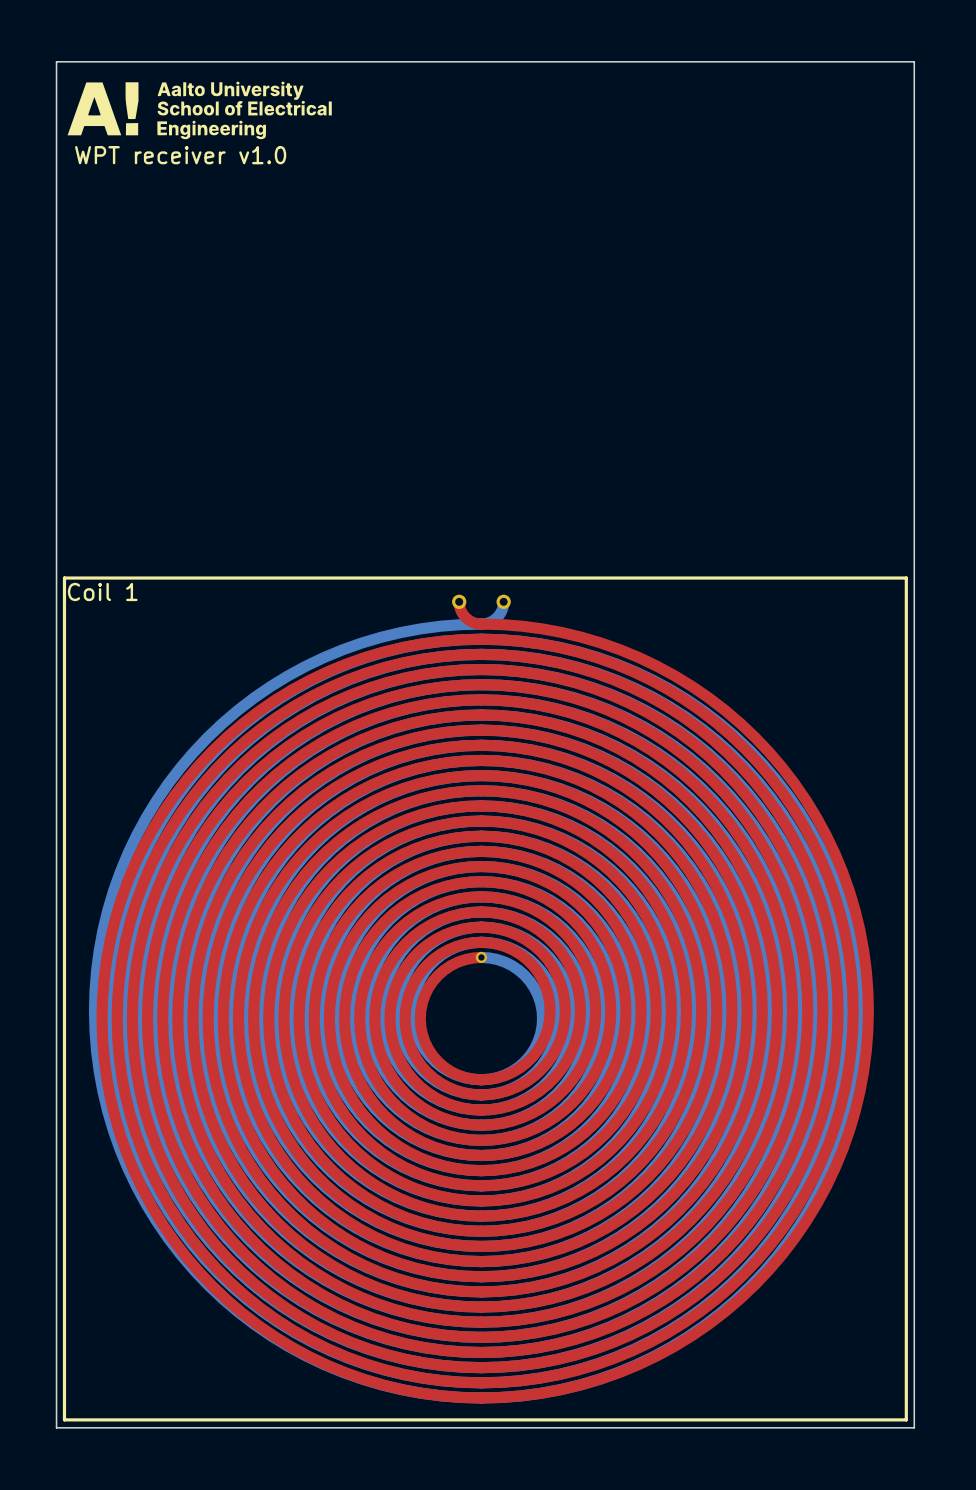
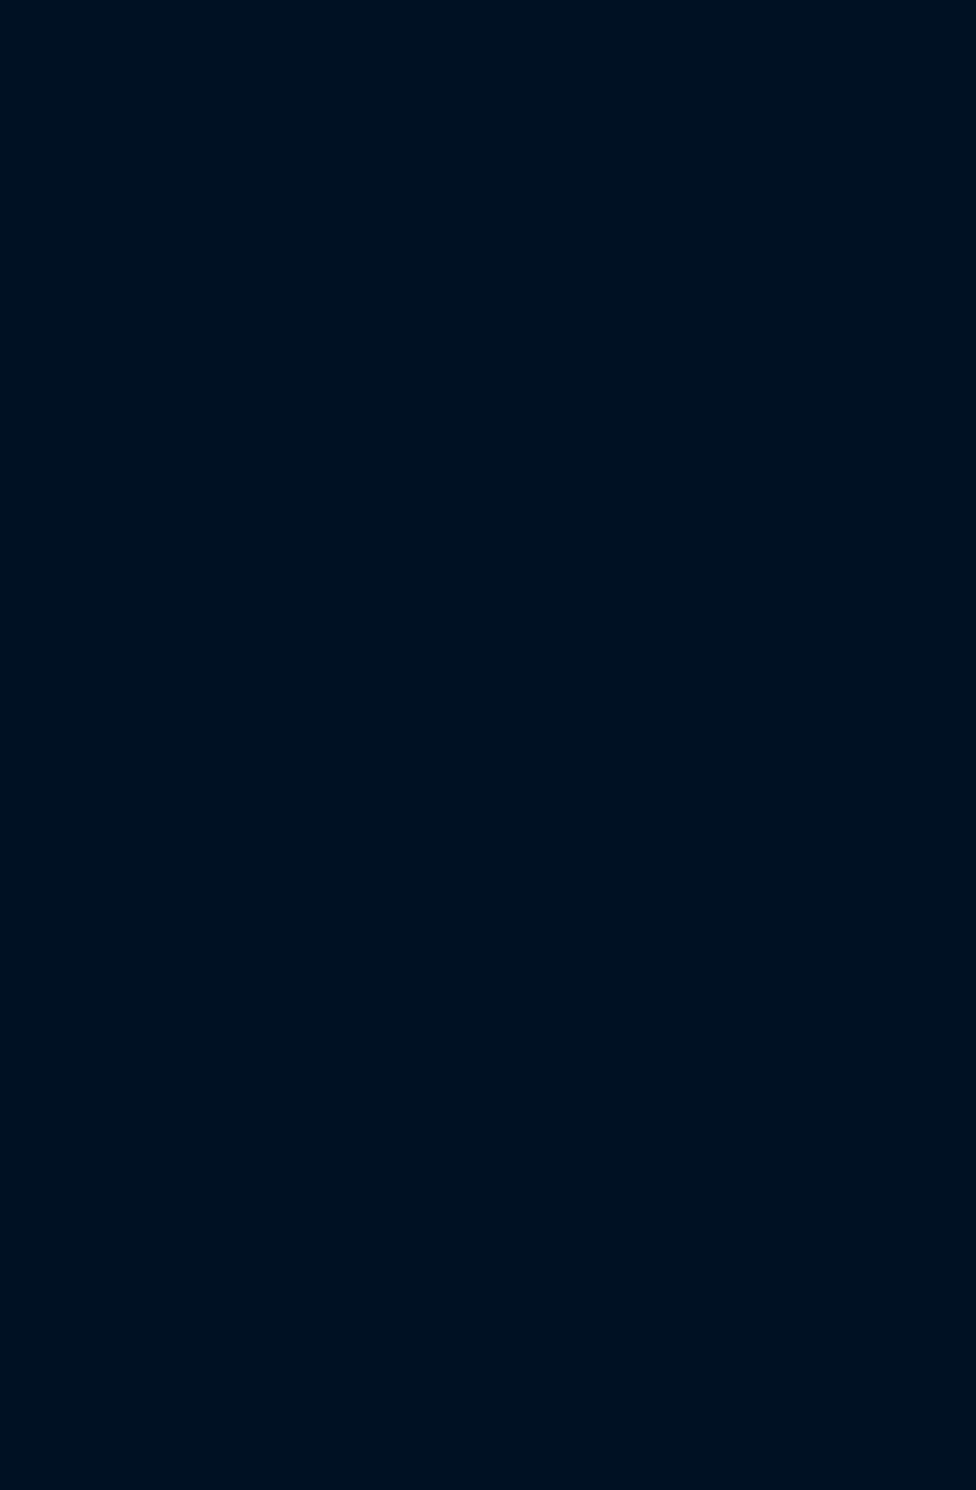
board edge: (56, 61) (914, 61) (914, 1427) (56, 1427) (56, 61) -> none
drawing: [67, 81, 332, 140] -> none
text: WPT receiver v1.0 (180, 155) -> none
line: (64, 578) (906, 578) (906, 1419) (64, 1419) (64, 578) -> none
text: Coil 1 (102, 591) -> none
part: (481, 999) -> none

